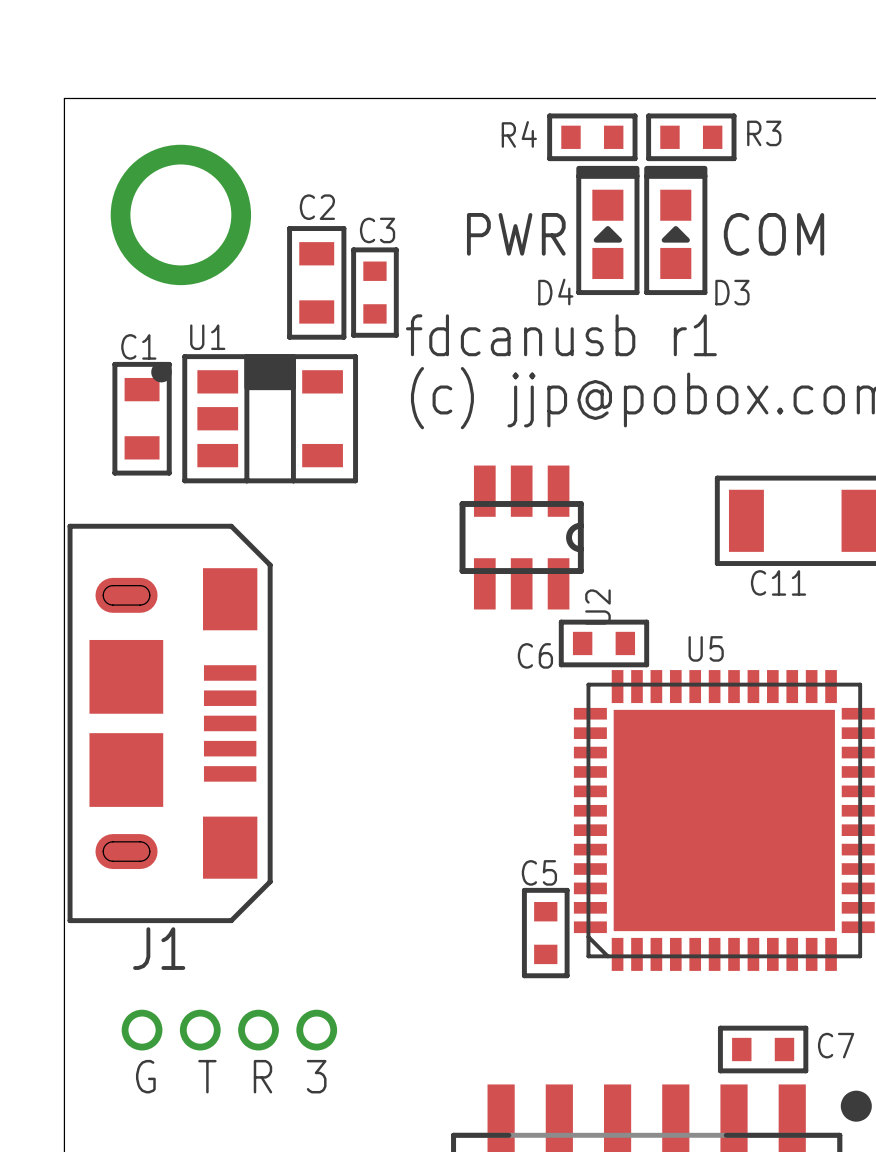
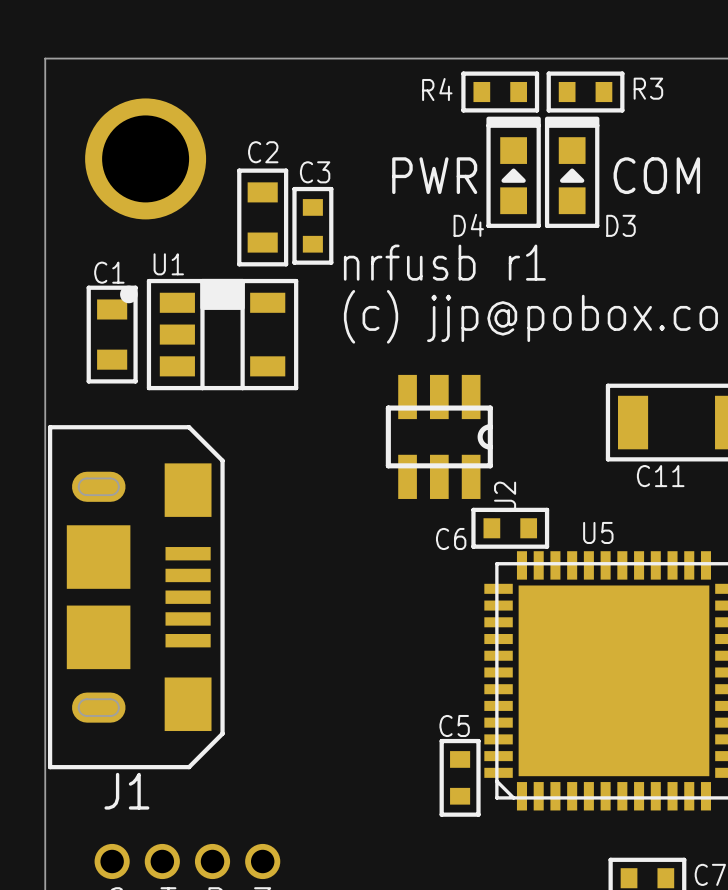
text: fdcanusb r1 (561, 335) -> nrfusb r1 (444, 262)

